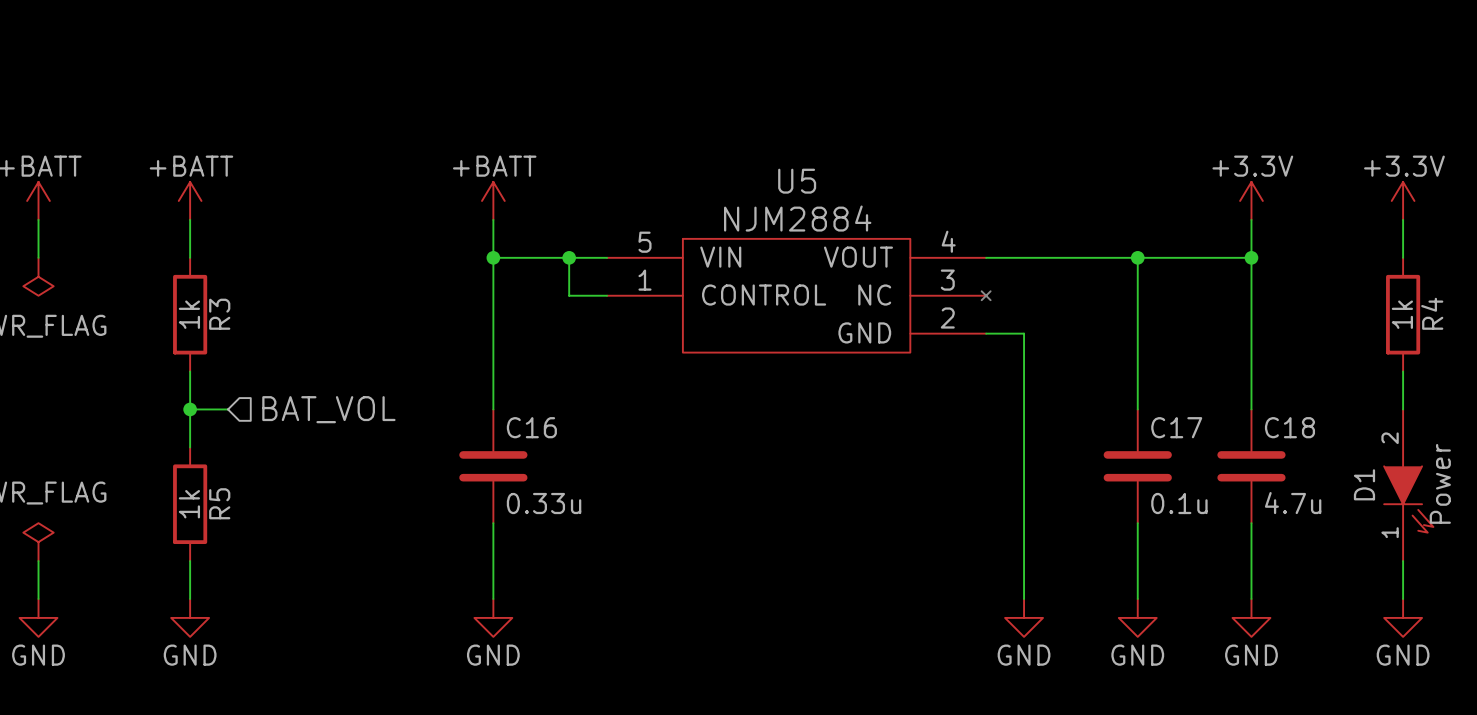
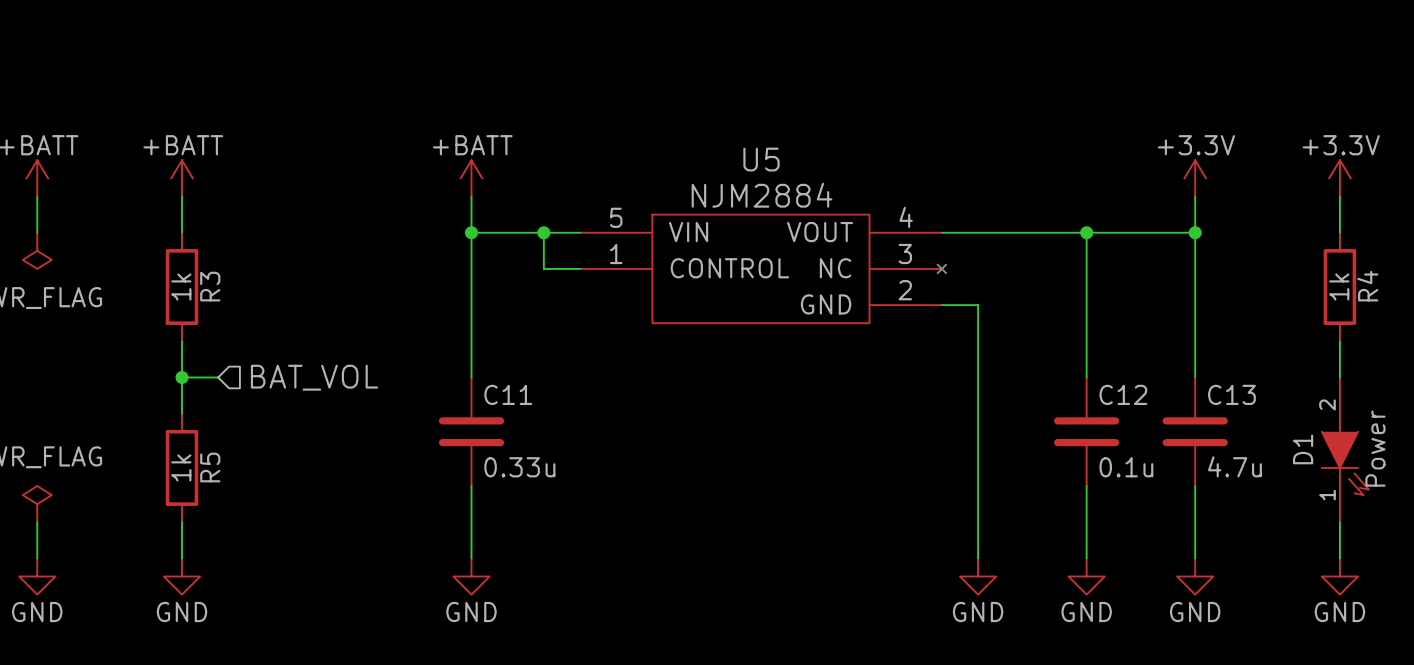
C16 name: C16 (531, 427) -> C11 (508, 394)
C17 name: C17 (1176, 427) -> C12 (1123, 394)
C18 name: C18 (1289, 427) -> C13 (1231, 394)

